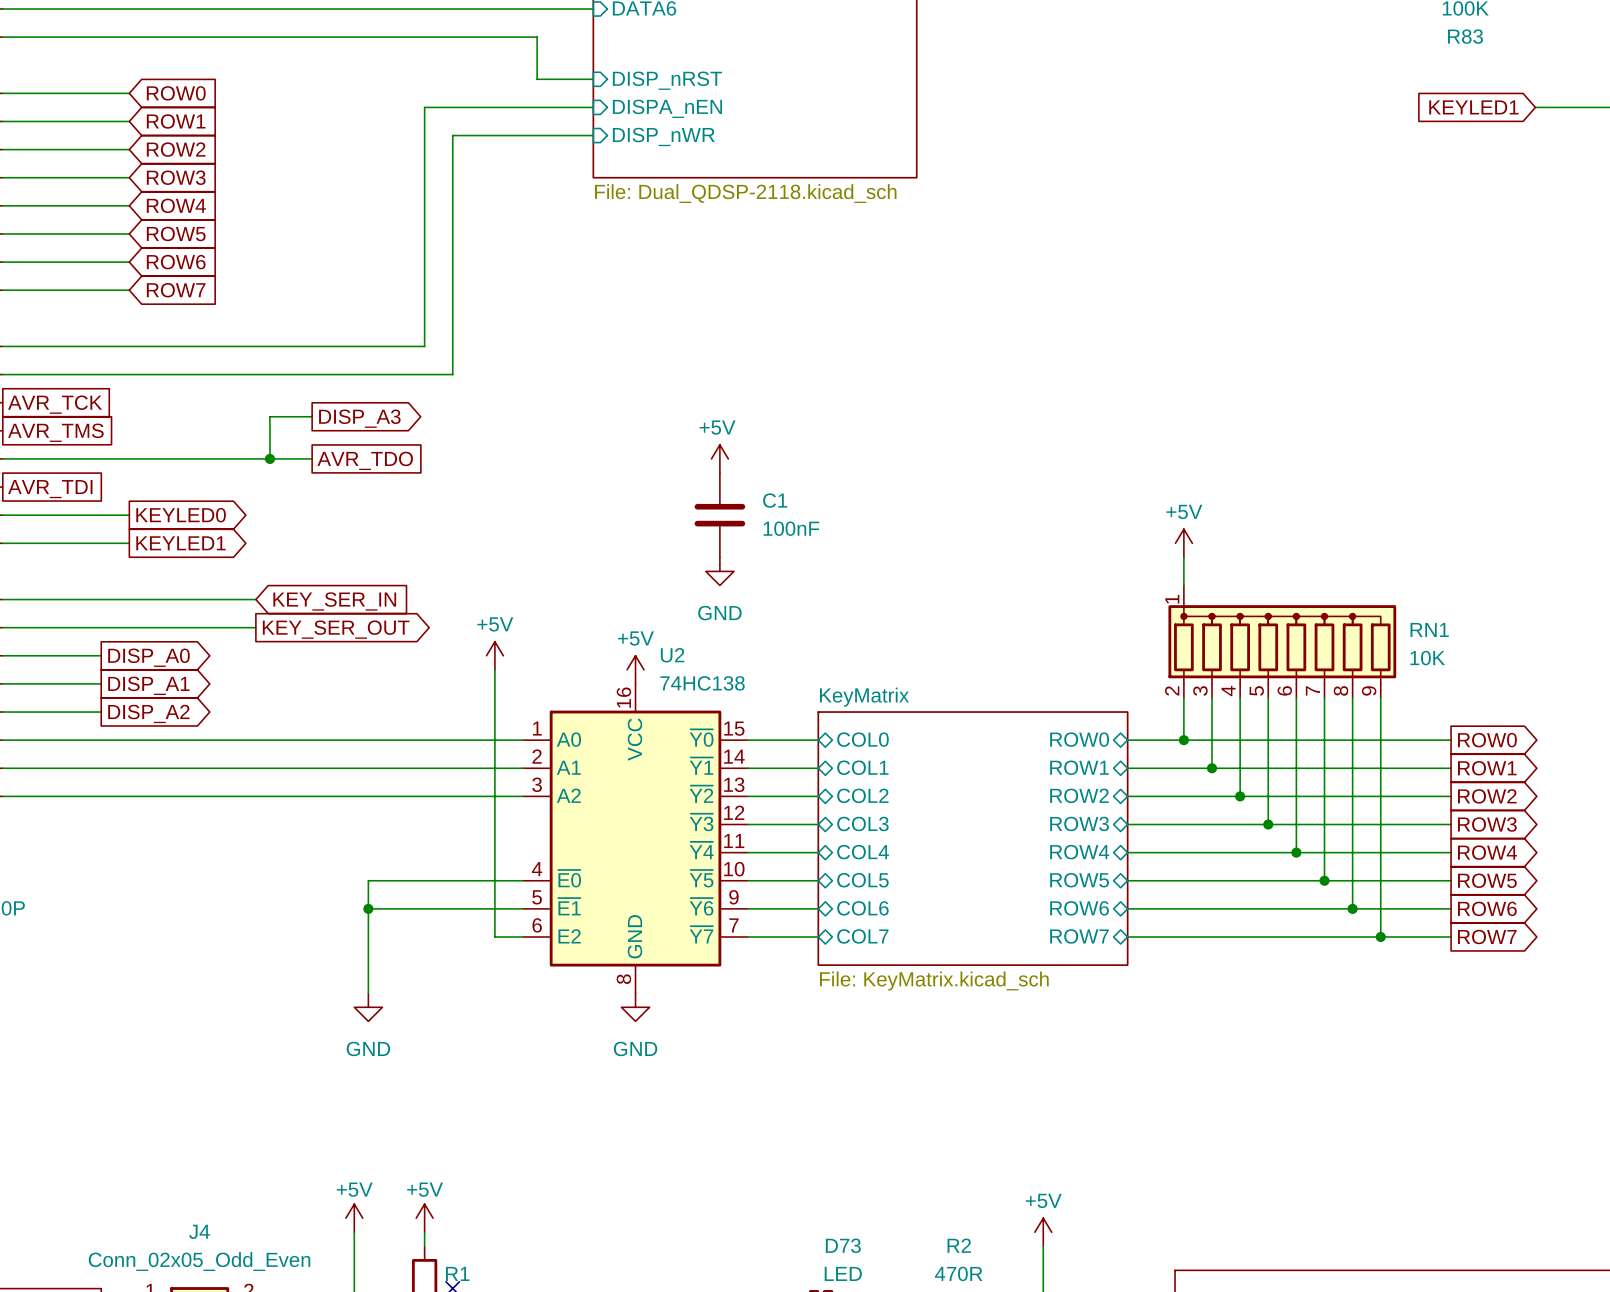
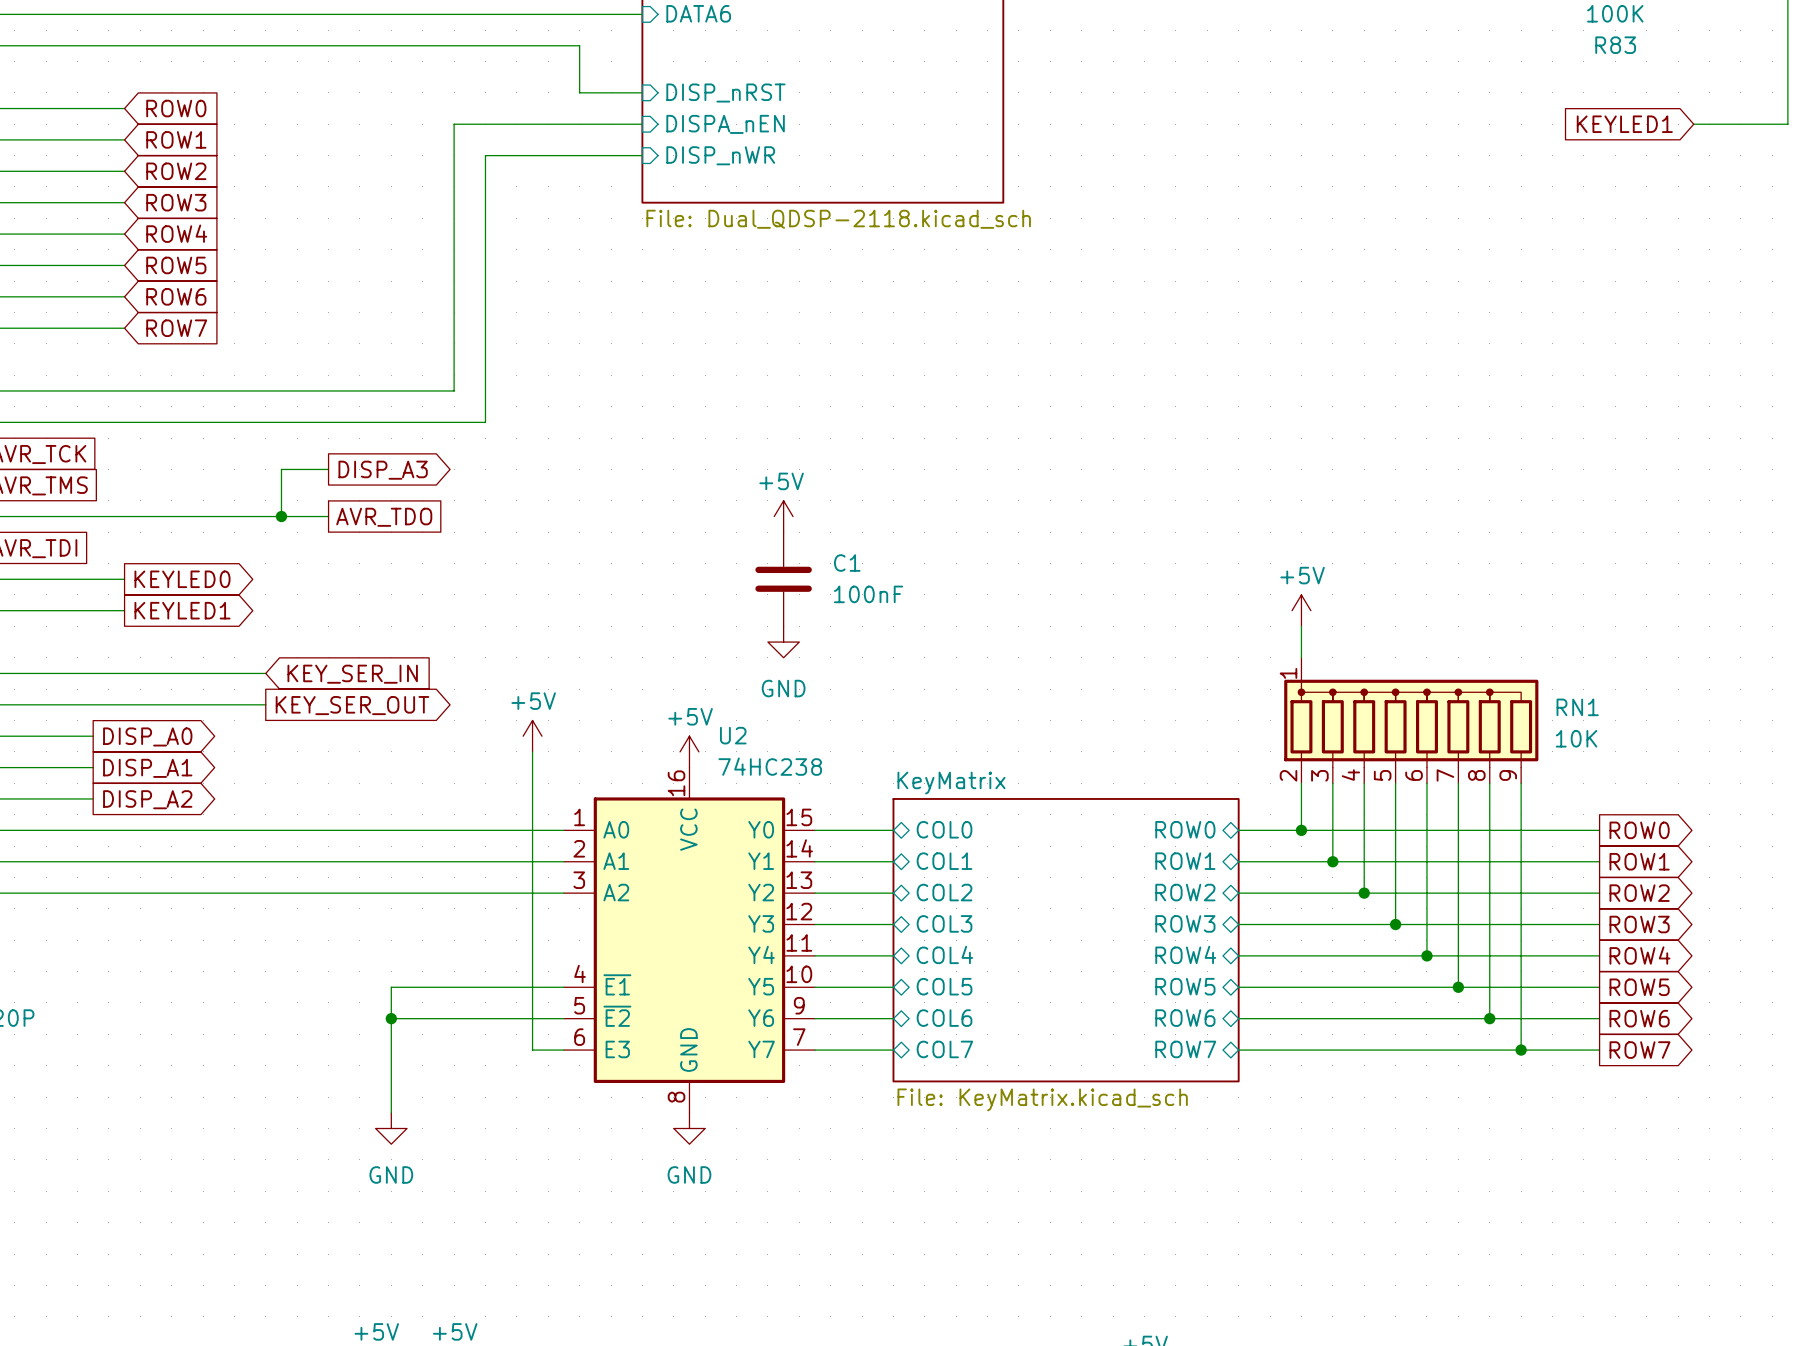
U2 symbol: [523, 683, 749, 994] -> [563, 767, 816, 1113]
U2 value: 74HC138 (702, 683) -> 74HC238 (770, 766)

